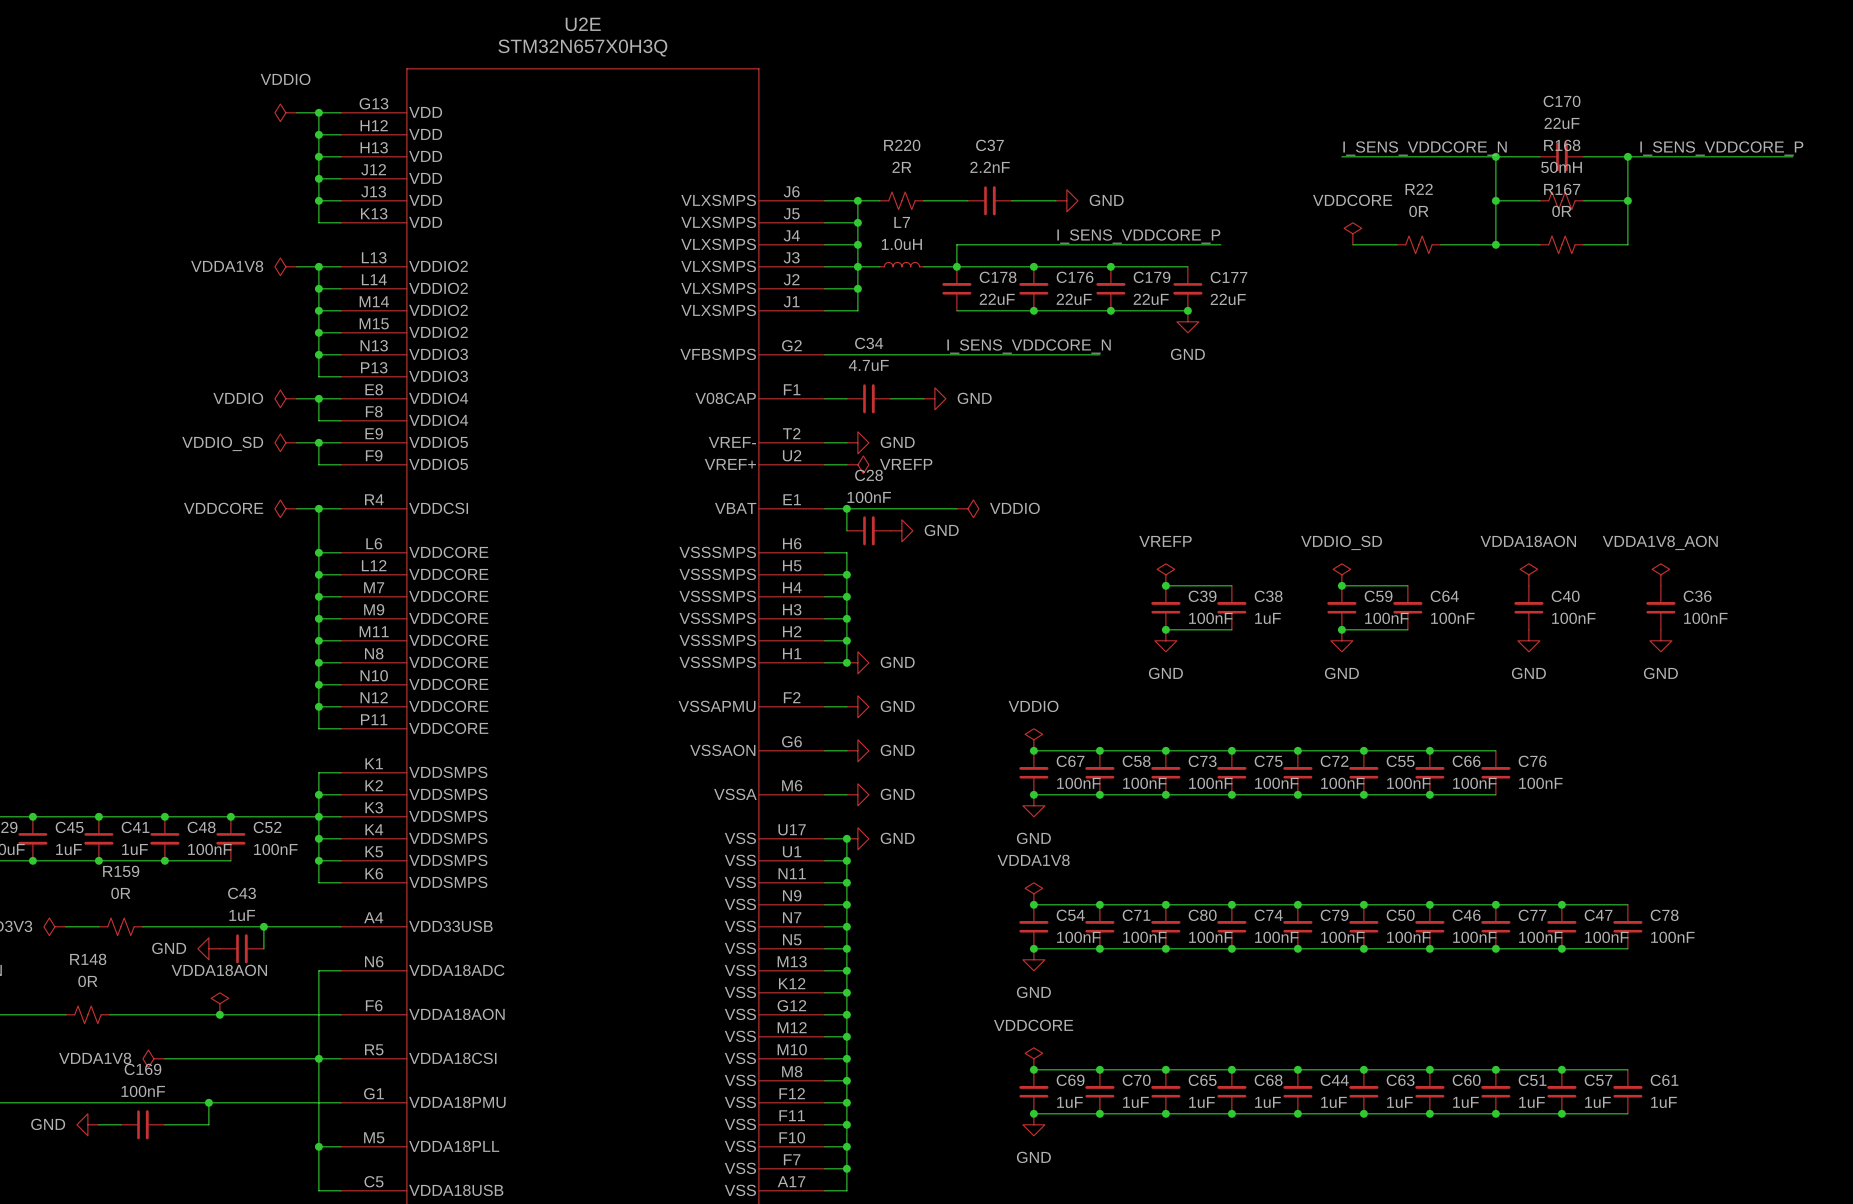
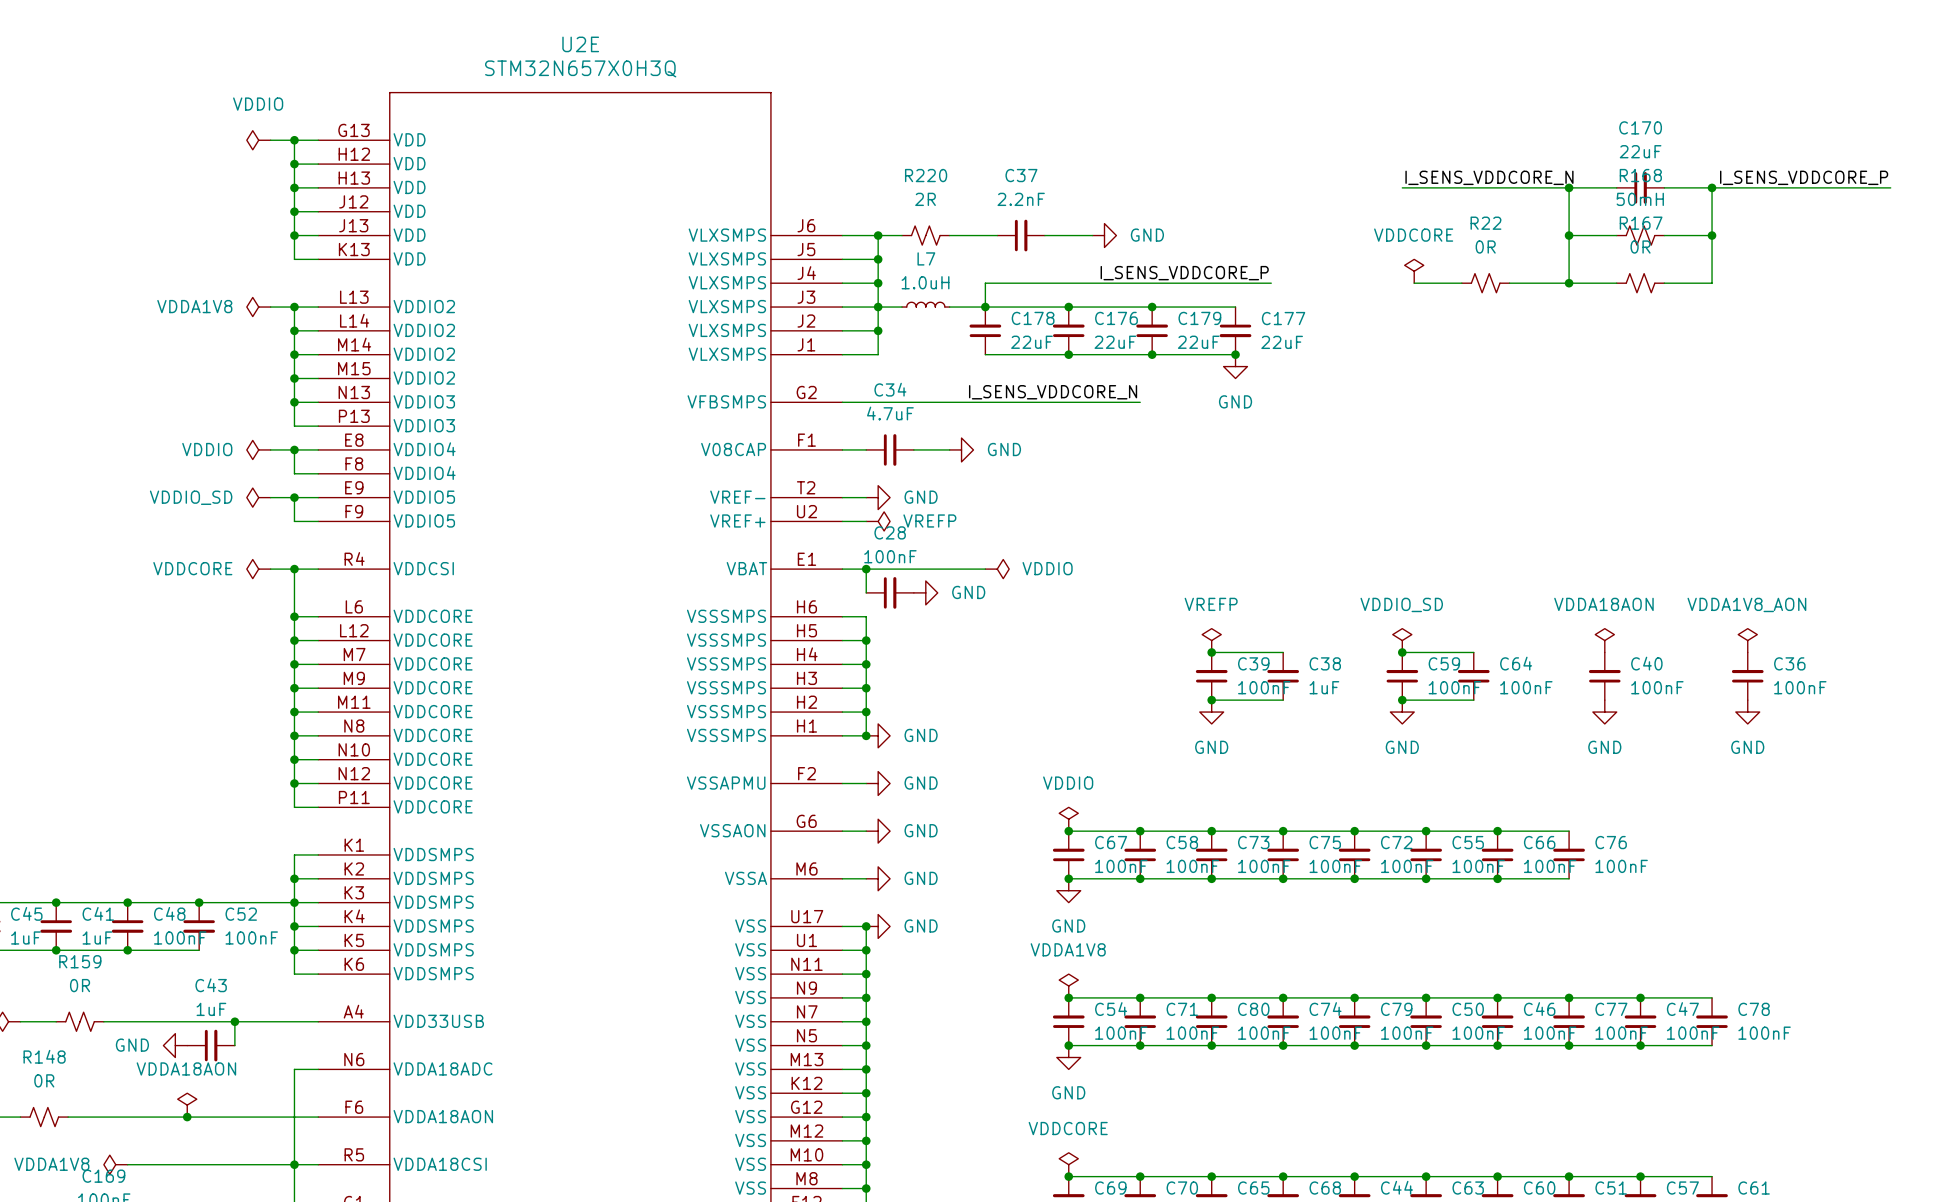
label position: I_SENS_VDDCORE_P (1721, 148) -> I_SENS_VDDCORE_P (1804, 177)
label position: I_SENS_VDDCORE_P (1138, 236) -> I_SENS_VDDCORE_P (1184, 273)
label position: I_SENS_VDDCORE_N (1029, 346) -> I_SENS_VDDCORE_N (1053, 392)

